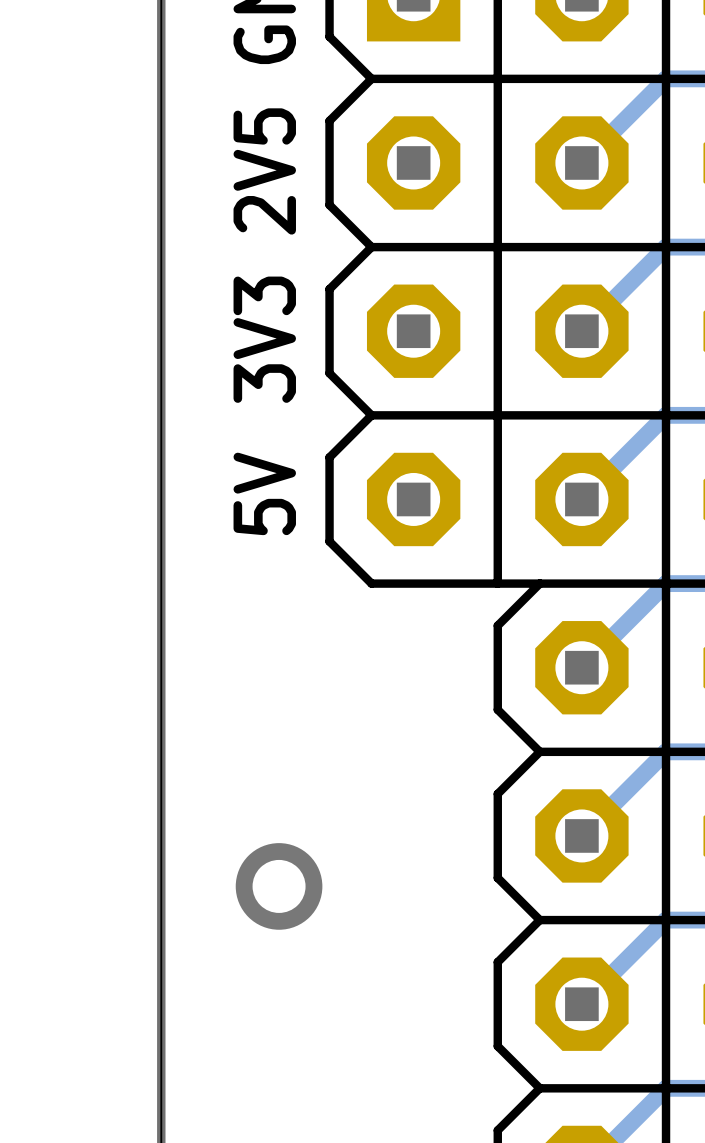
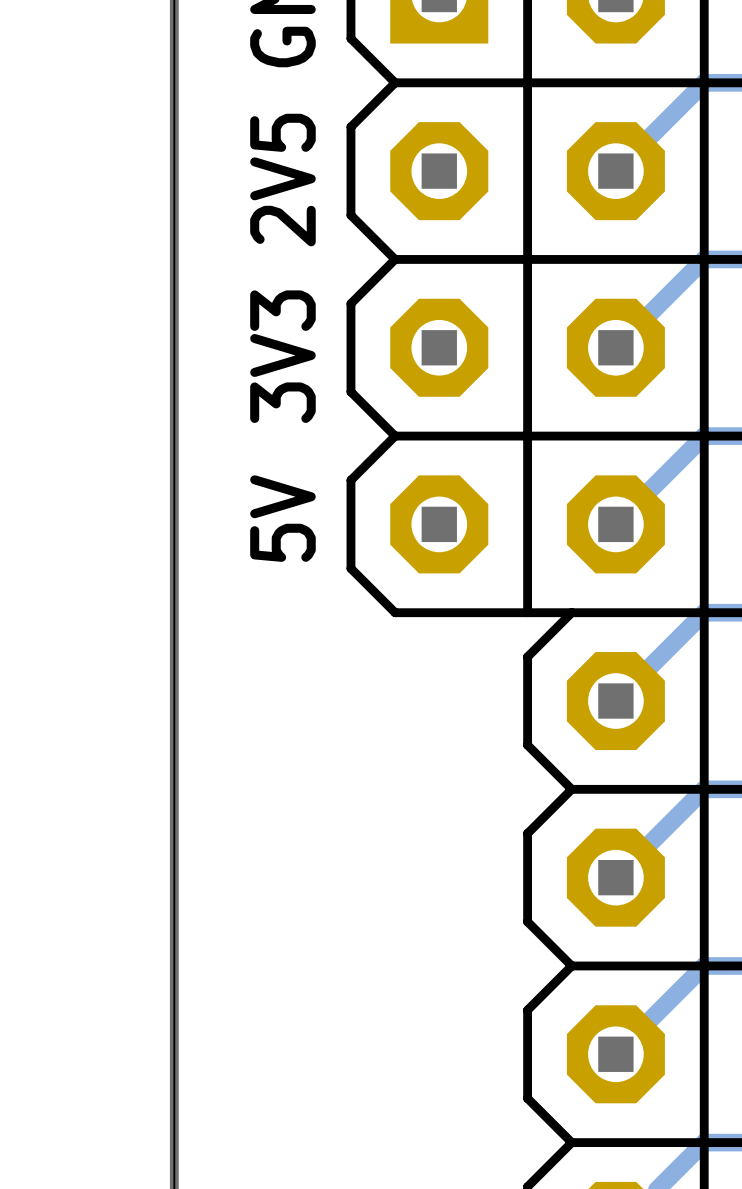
via: (279, 886) -> none

